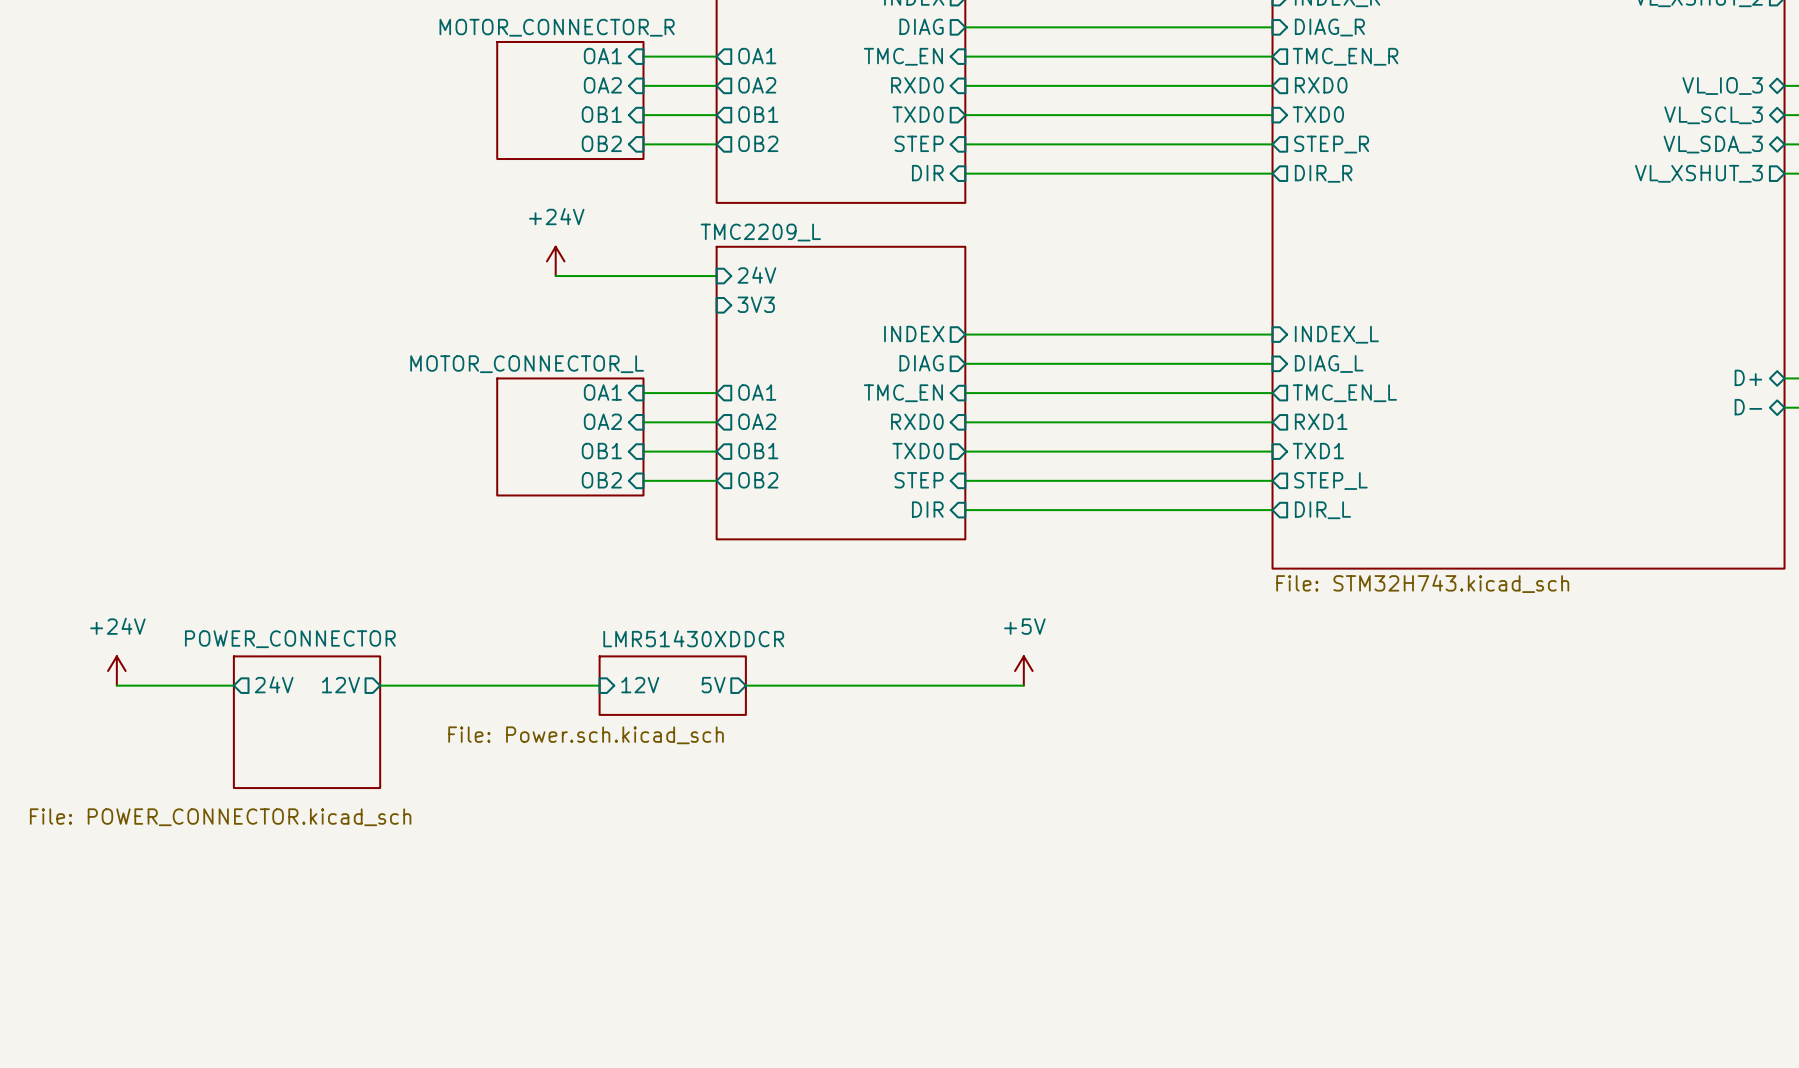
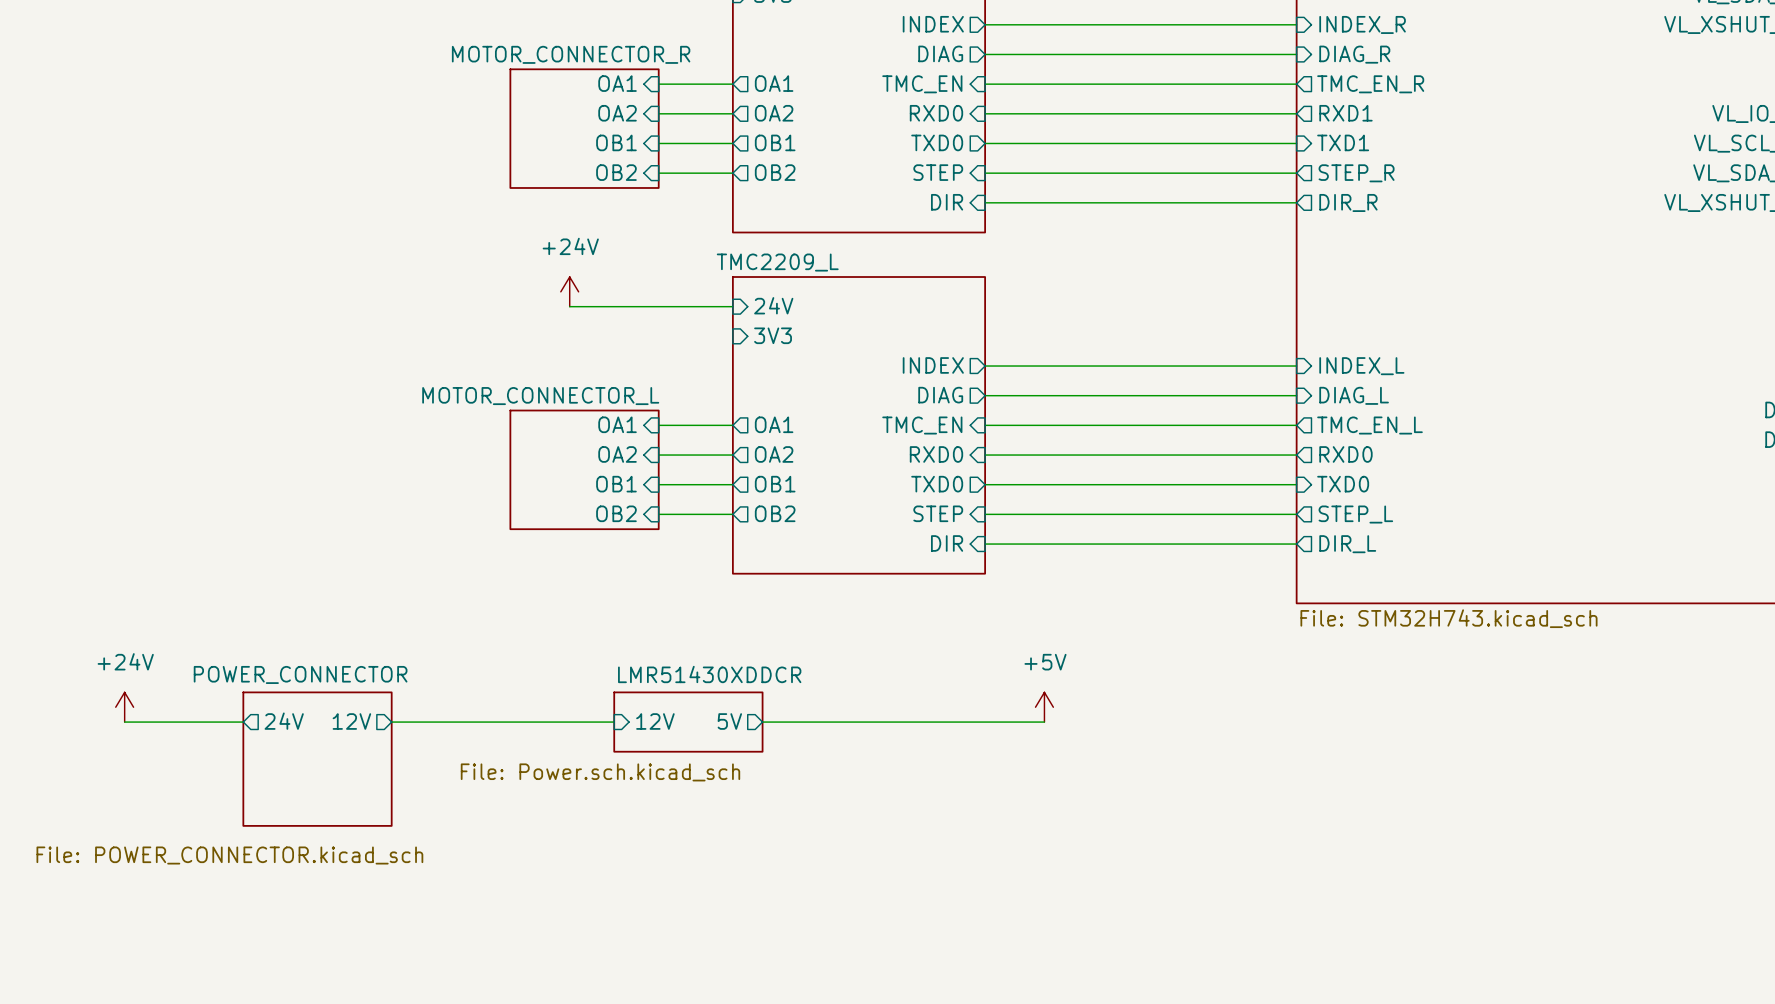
sheet pin: RXD0 (1321, 85) -> RXD1 (1345, 113)
sheet pin: TXD0 (1318, 114) -> TXD1 (1343, 142)
sheet pin: RXD1 (1321, 421) -> RXD0 (1345, 454)
sheet pin: TXD1 (1318, 451) -> TXD0 (1343, 484)

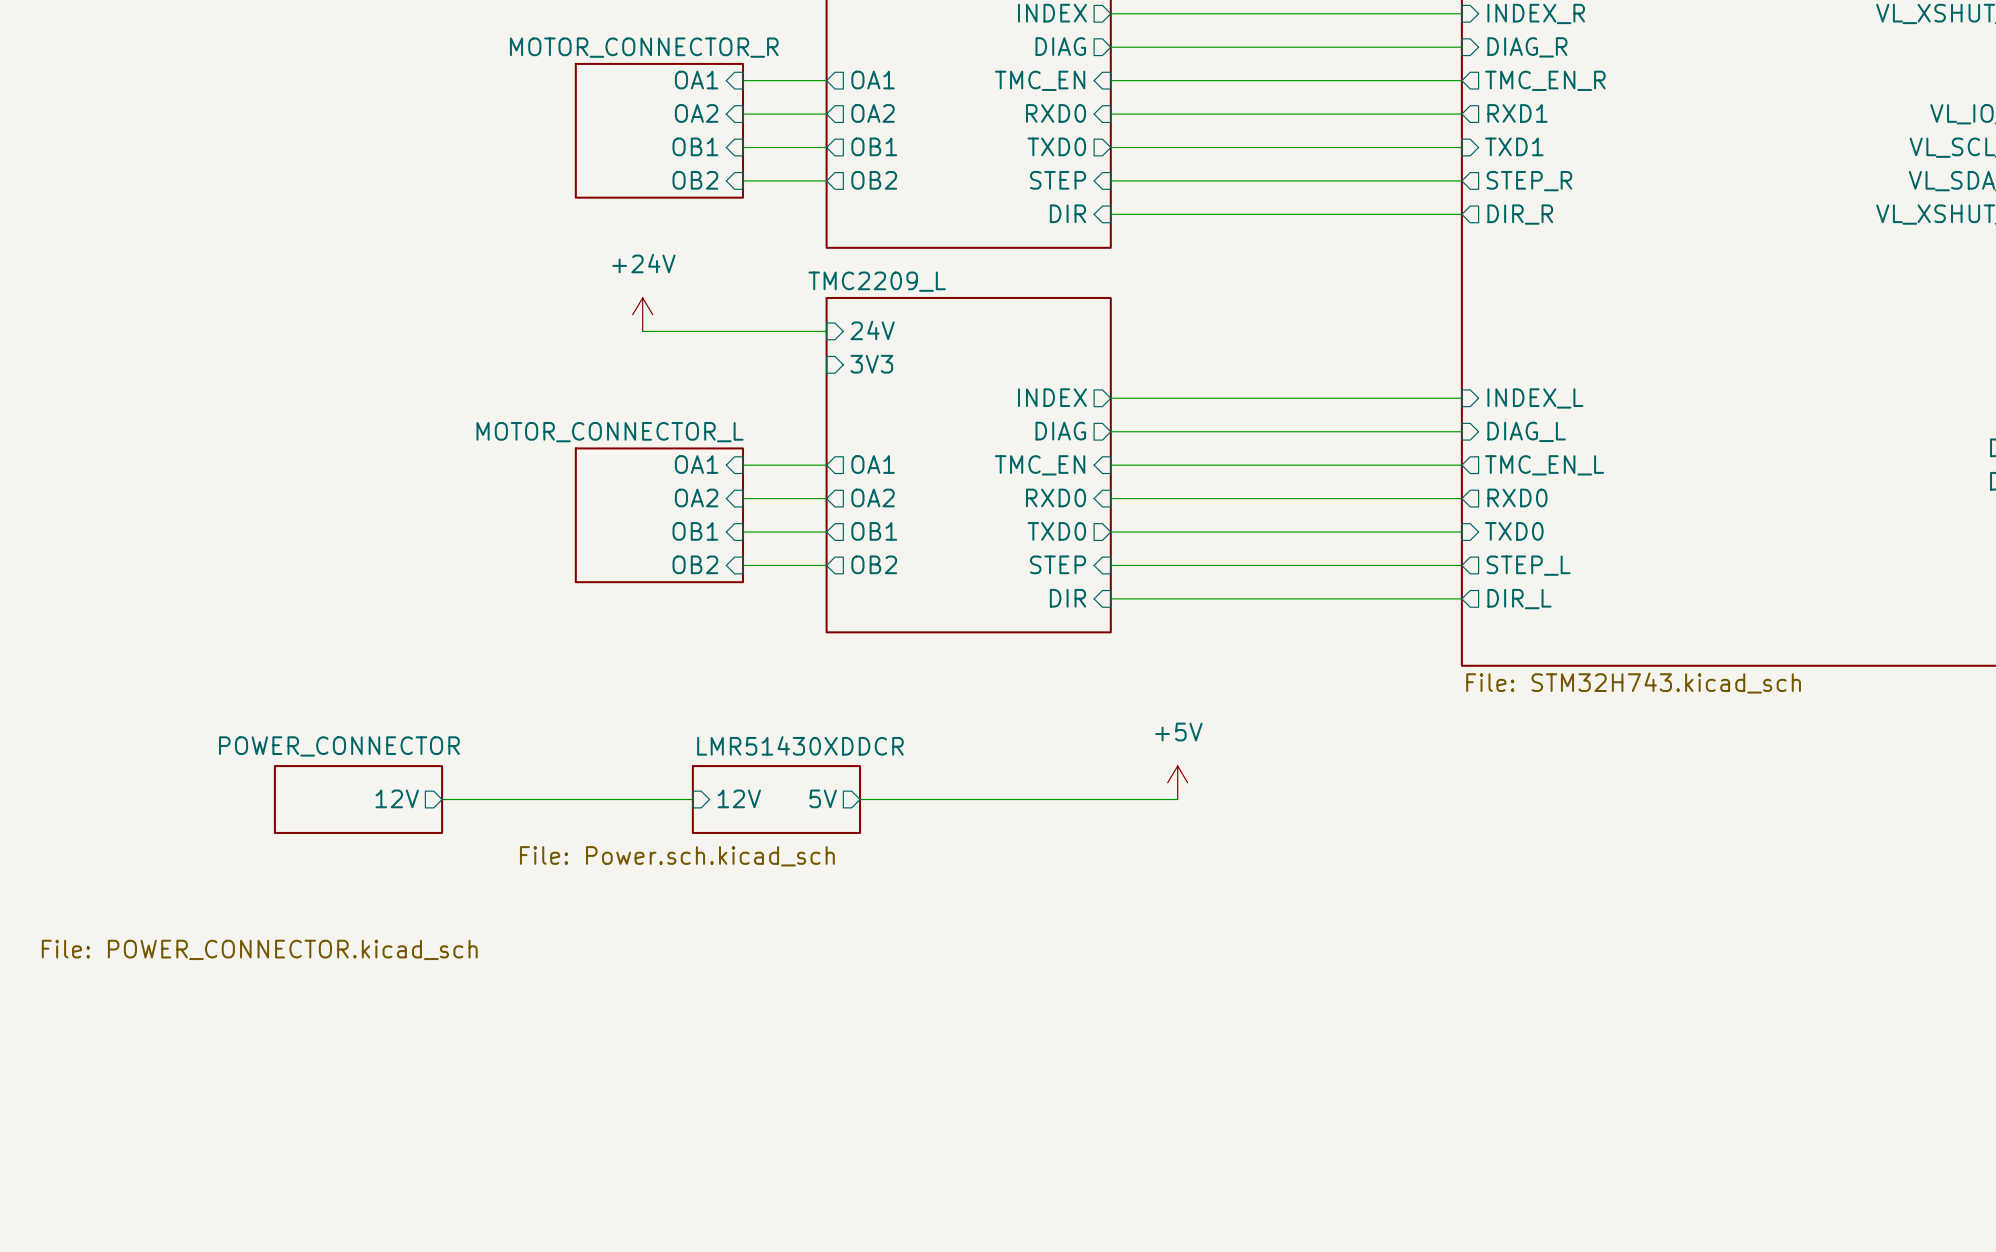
power symbol: +24V (124, 707) -> none
sheet pin: 24V (284, 721) -> none
wire: (124, 722) (243, 722) -> none
sheet POWER_CONNECTOR: none -> File: POWER_CONNECTOR.kicad_sch (358, 799)
sheet POWER_CONNECTOR: File: POWER_CONNECTOR.kicad_sch (317, 759) -> none

